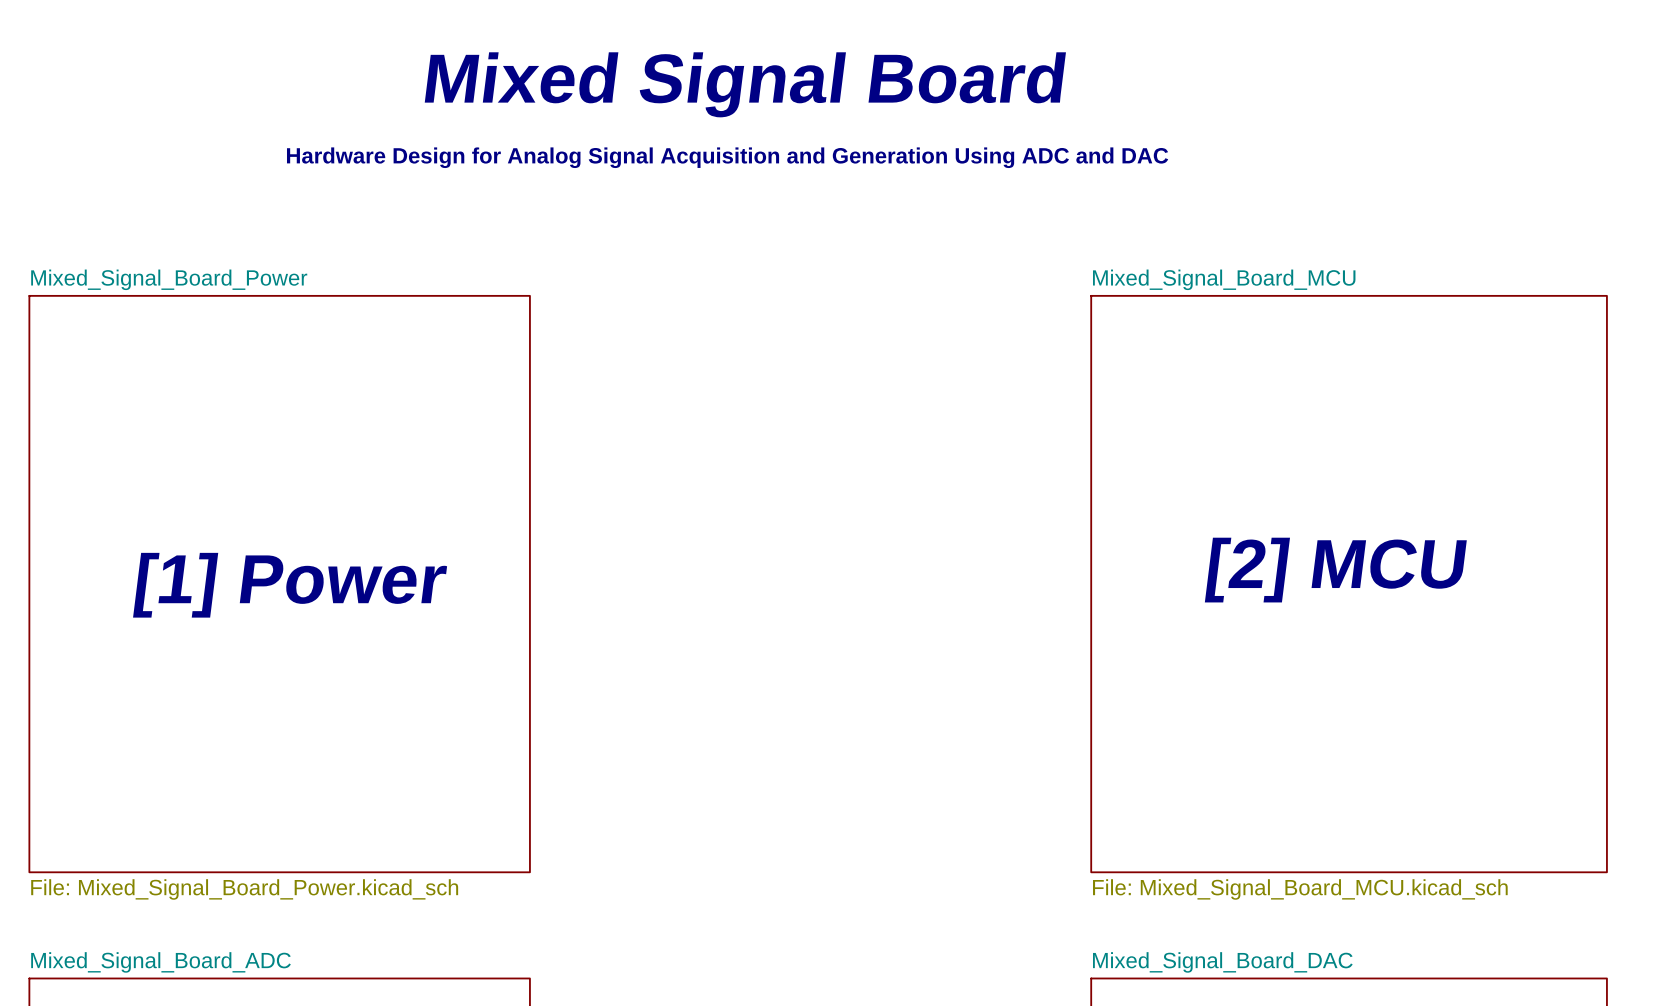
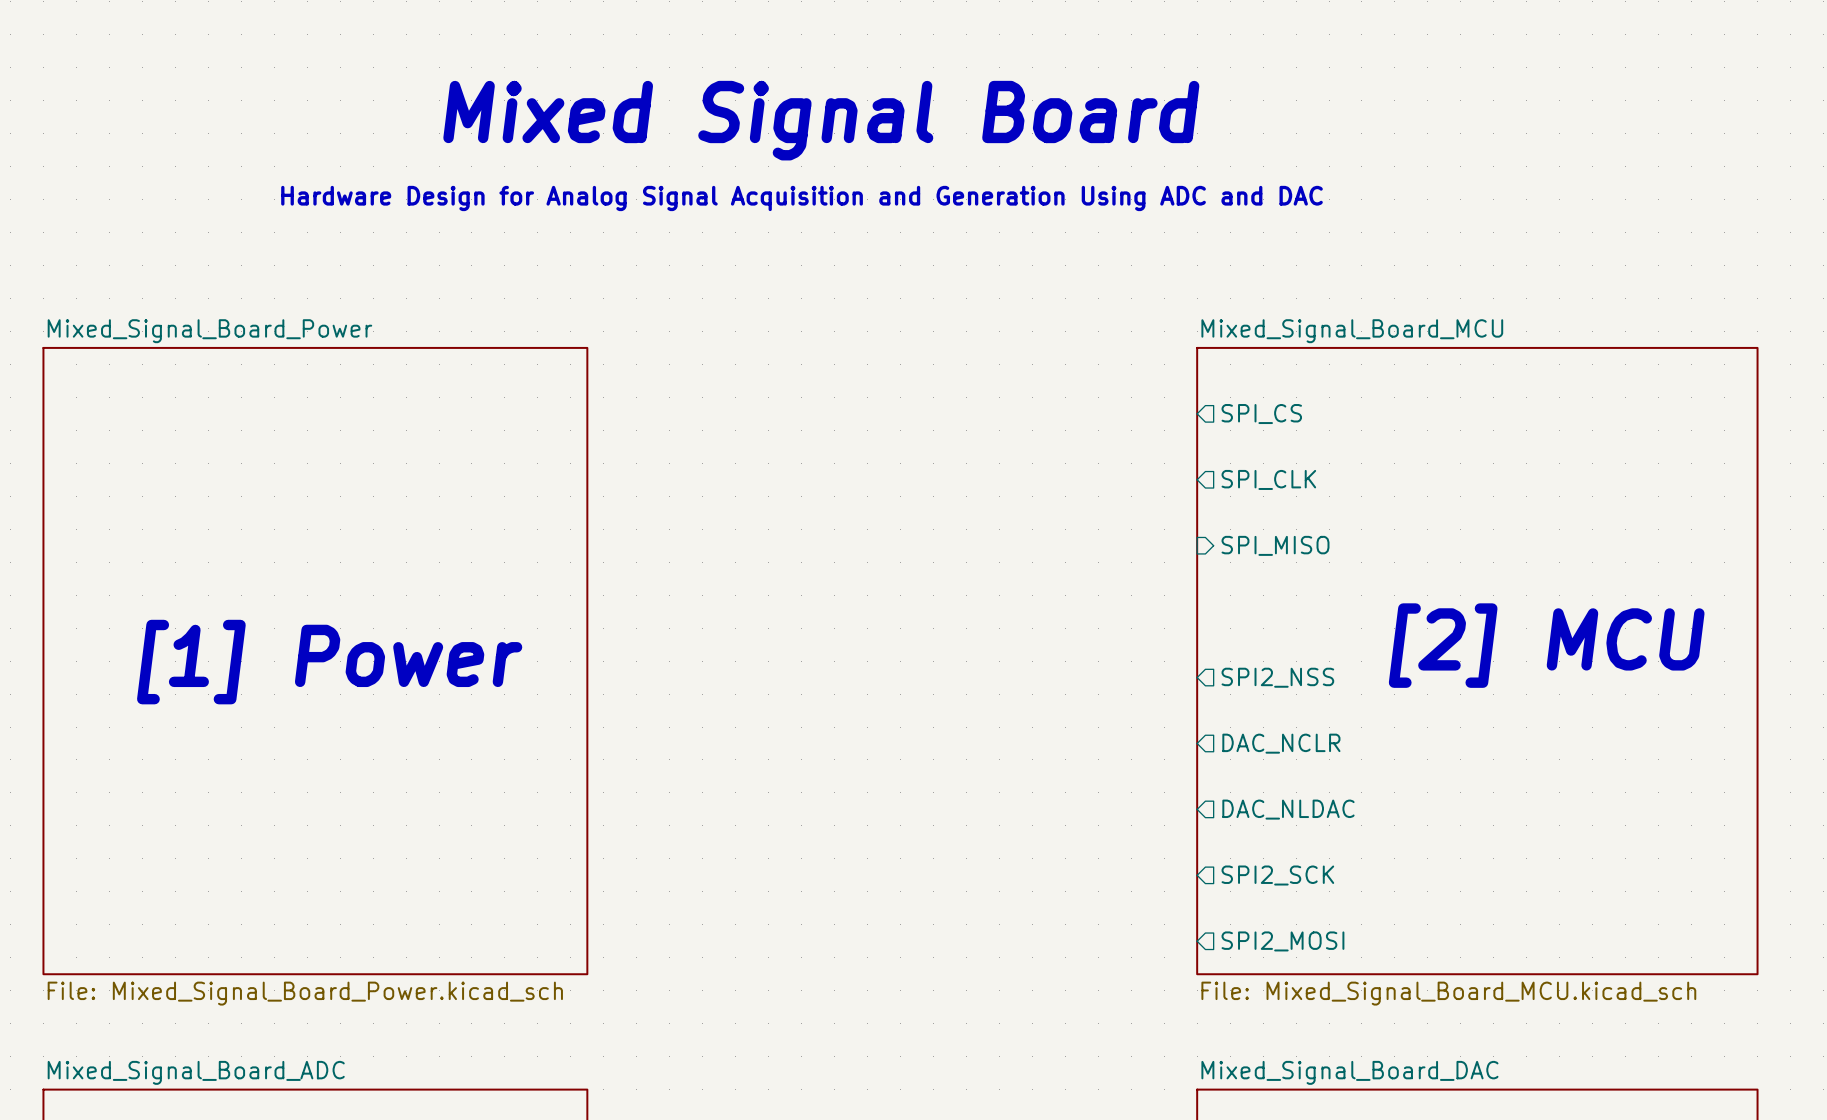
sheet pin: none -> SPI_CS (1261, 414)
sheet pin: none -> SPI_CLK (1268, 479)
sheet pin: none -> SPI_MISO (1275, 545)
text position: [2] MCU (1335, 570) -> [2] MCU (1546, 645)
sheet pin: none -> SPI2_NSS (1277, 677)
sheet pin: none -> DAC_NCLR (1281, 743)
sheet pin: none -> DAC_NLDAC (1288, 809)
sheet pin: none -> SPI2_SCK (1277, 875)
sheet pin: none -> SPI2_MOSI (1282, 941)

